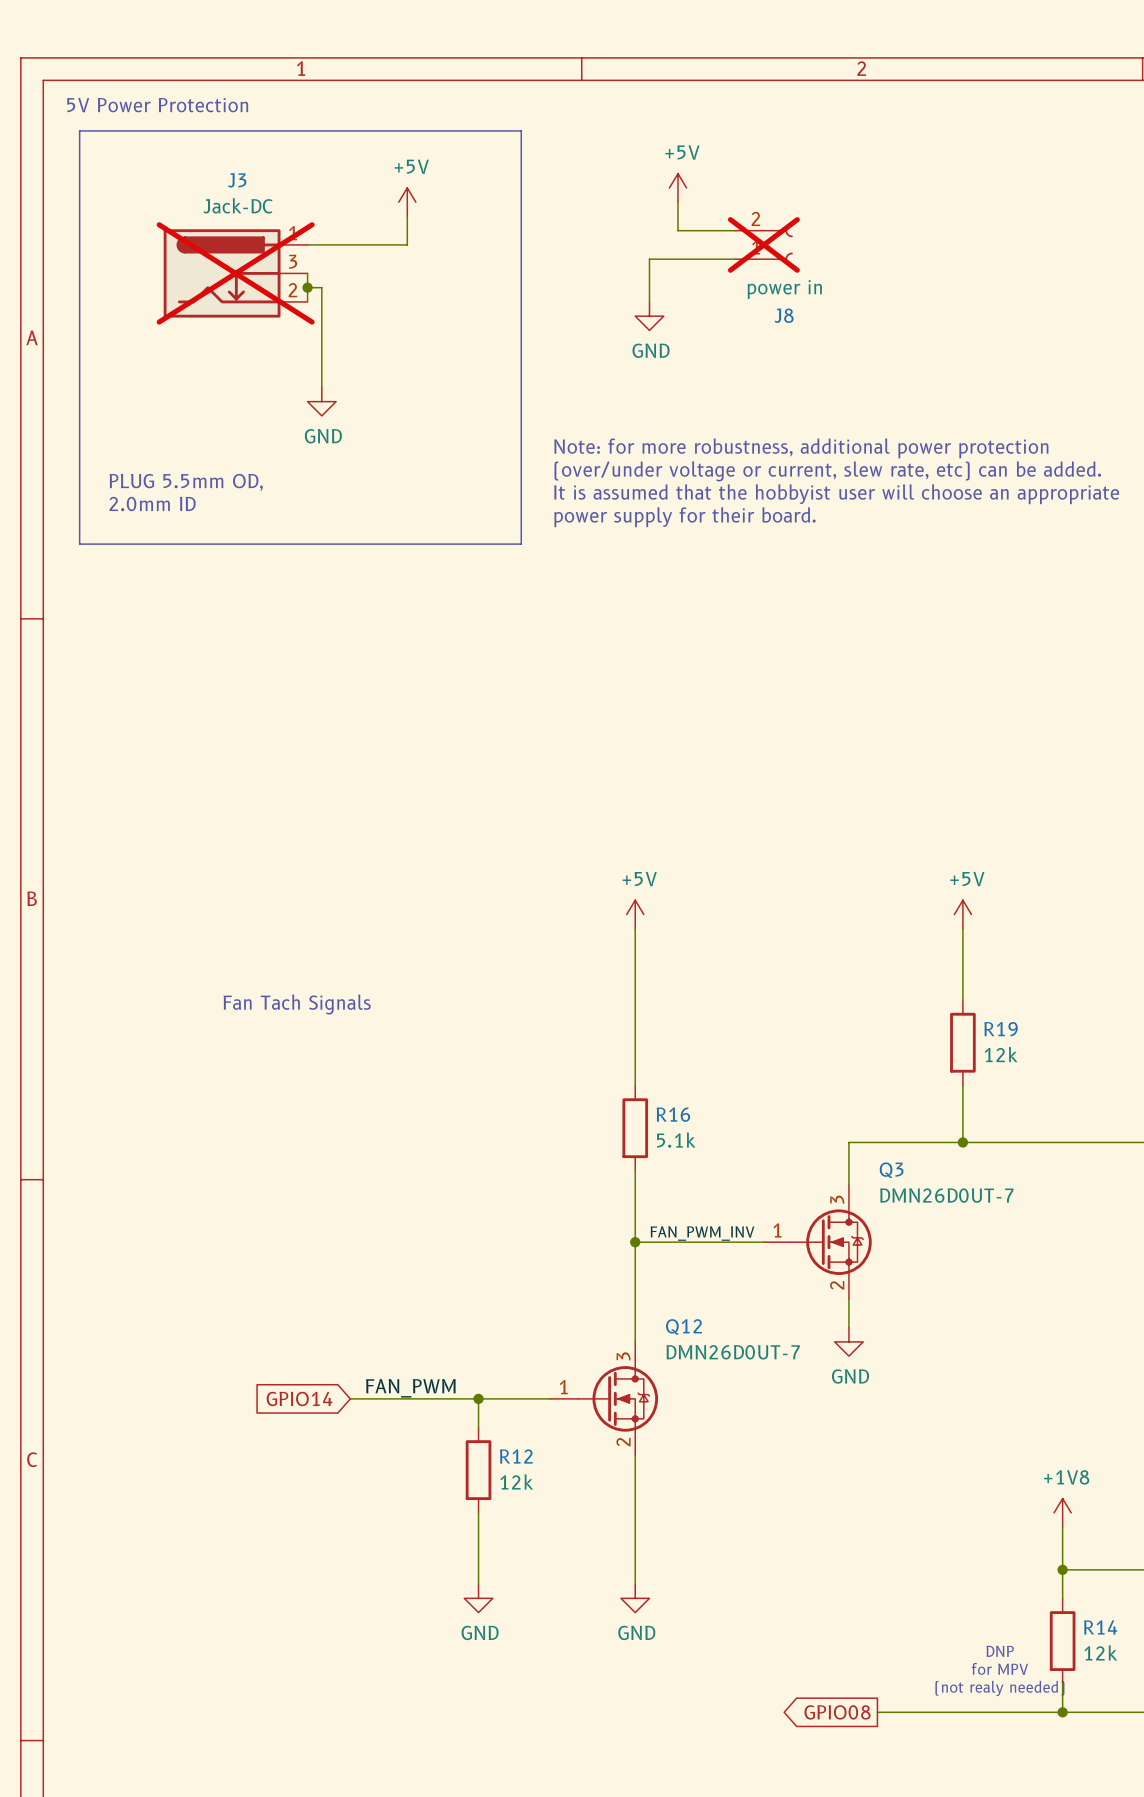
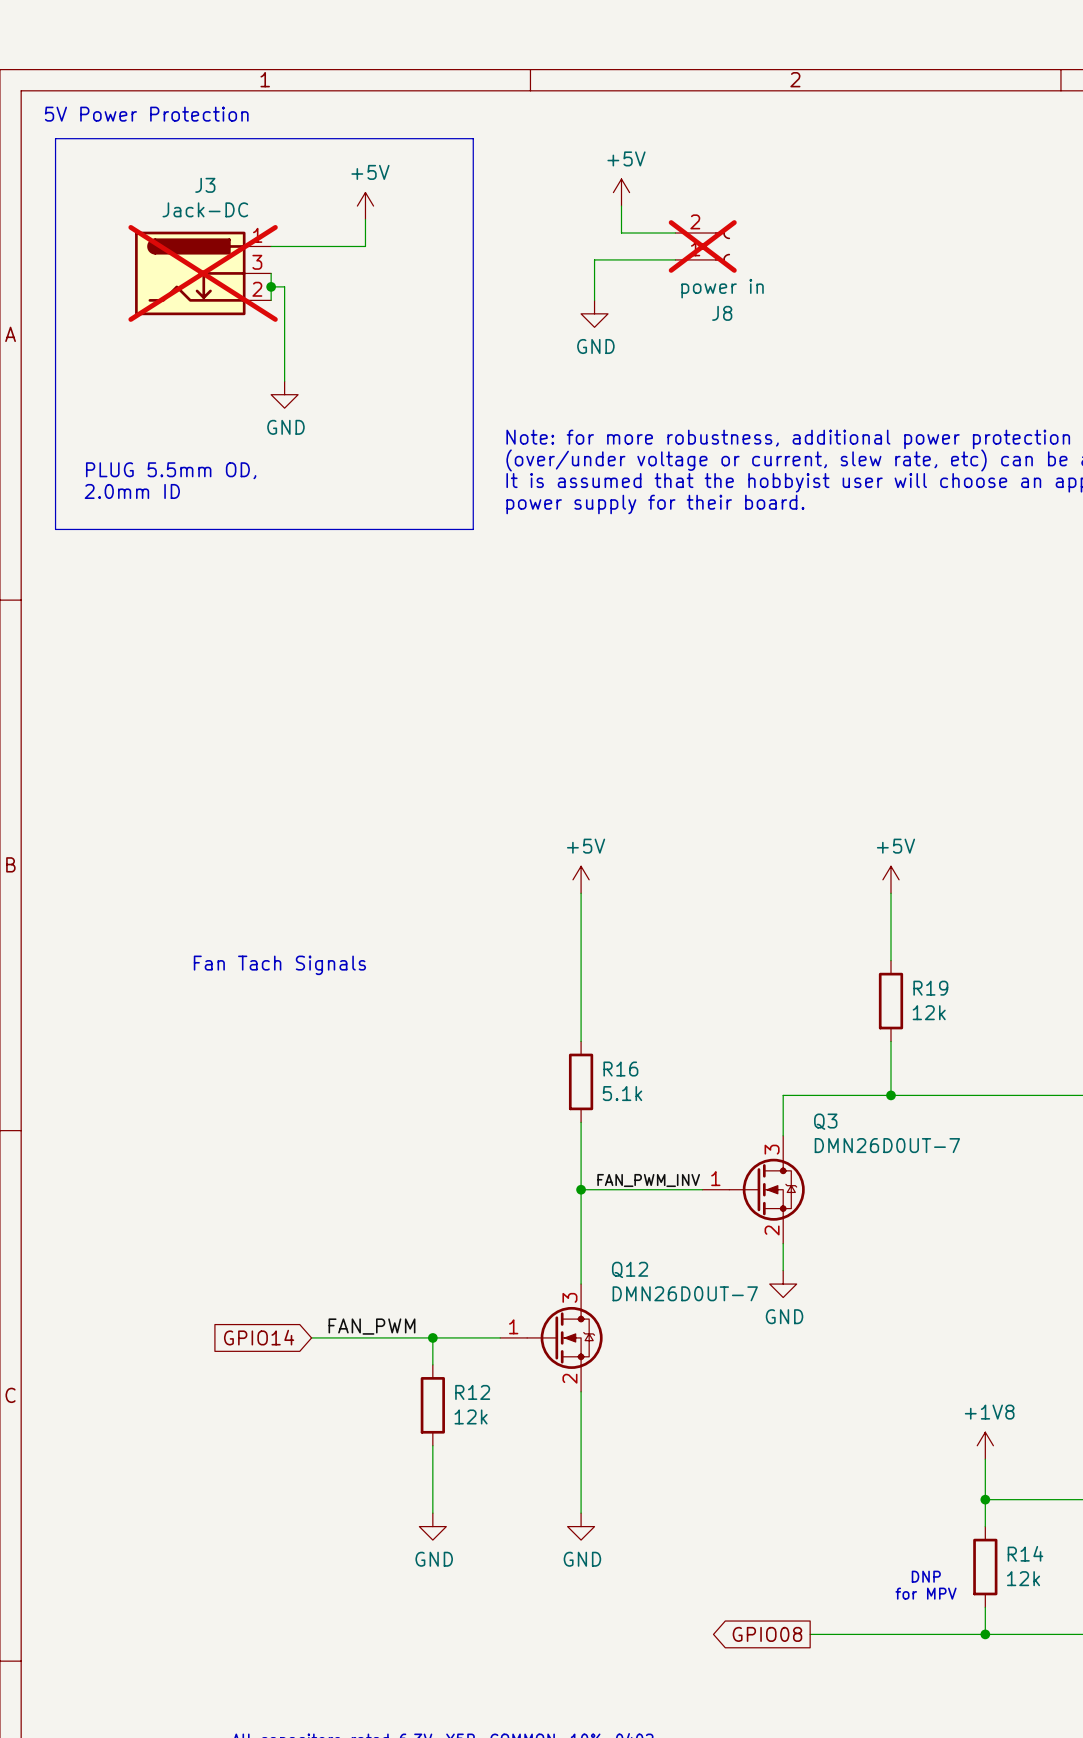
text: (not realy needed) (999, 1688) -> none

